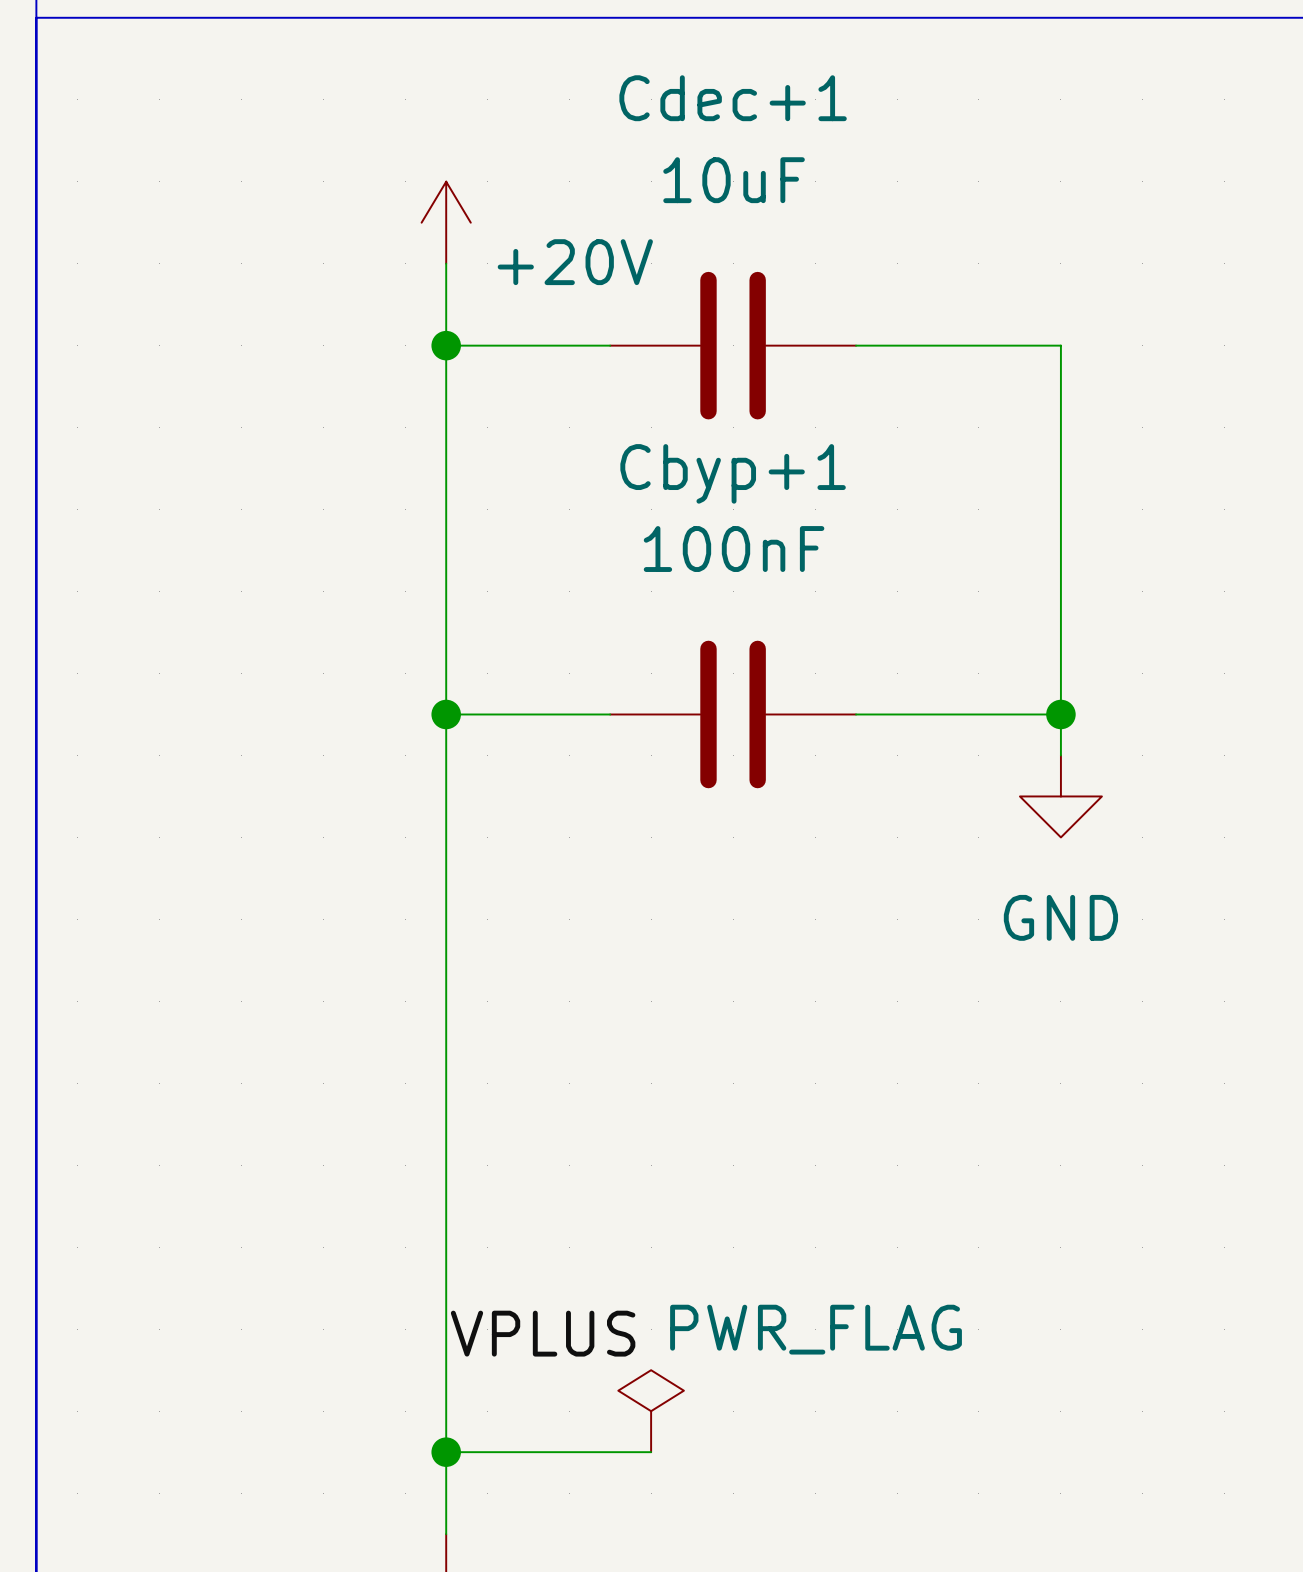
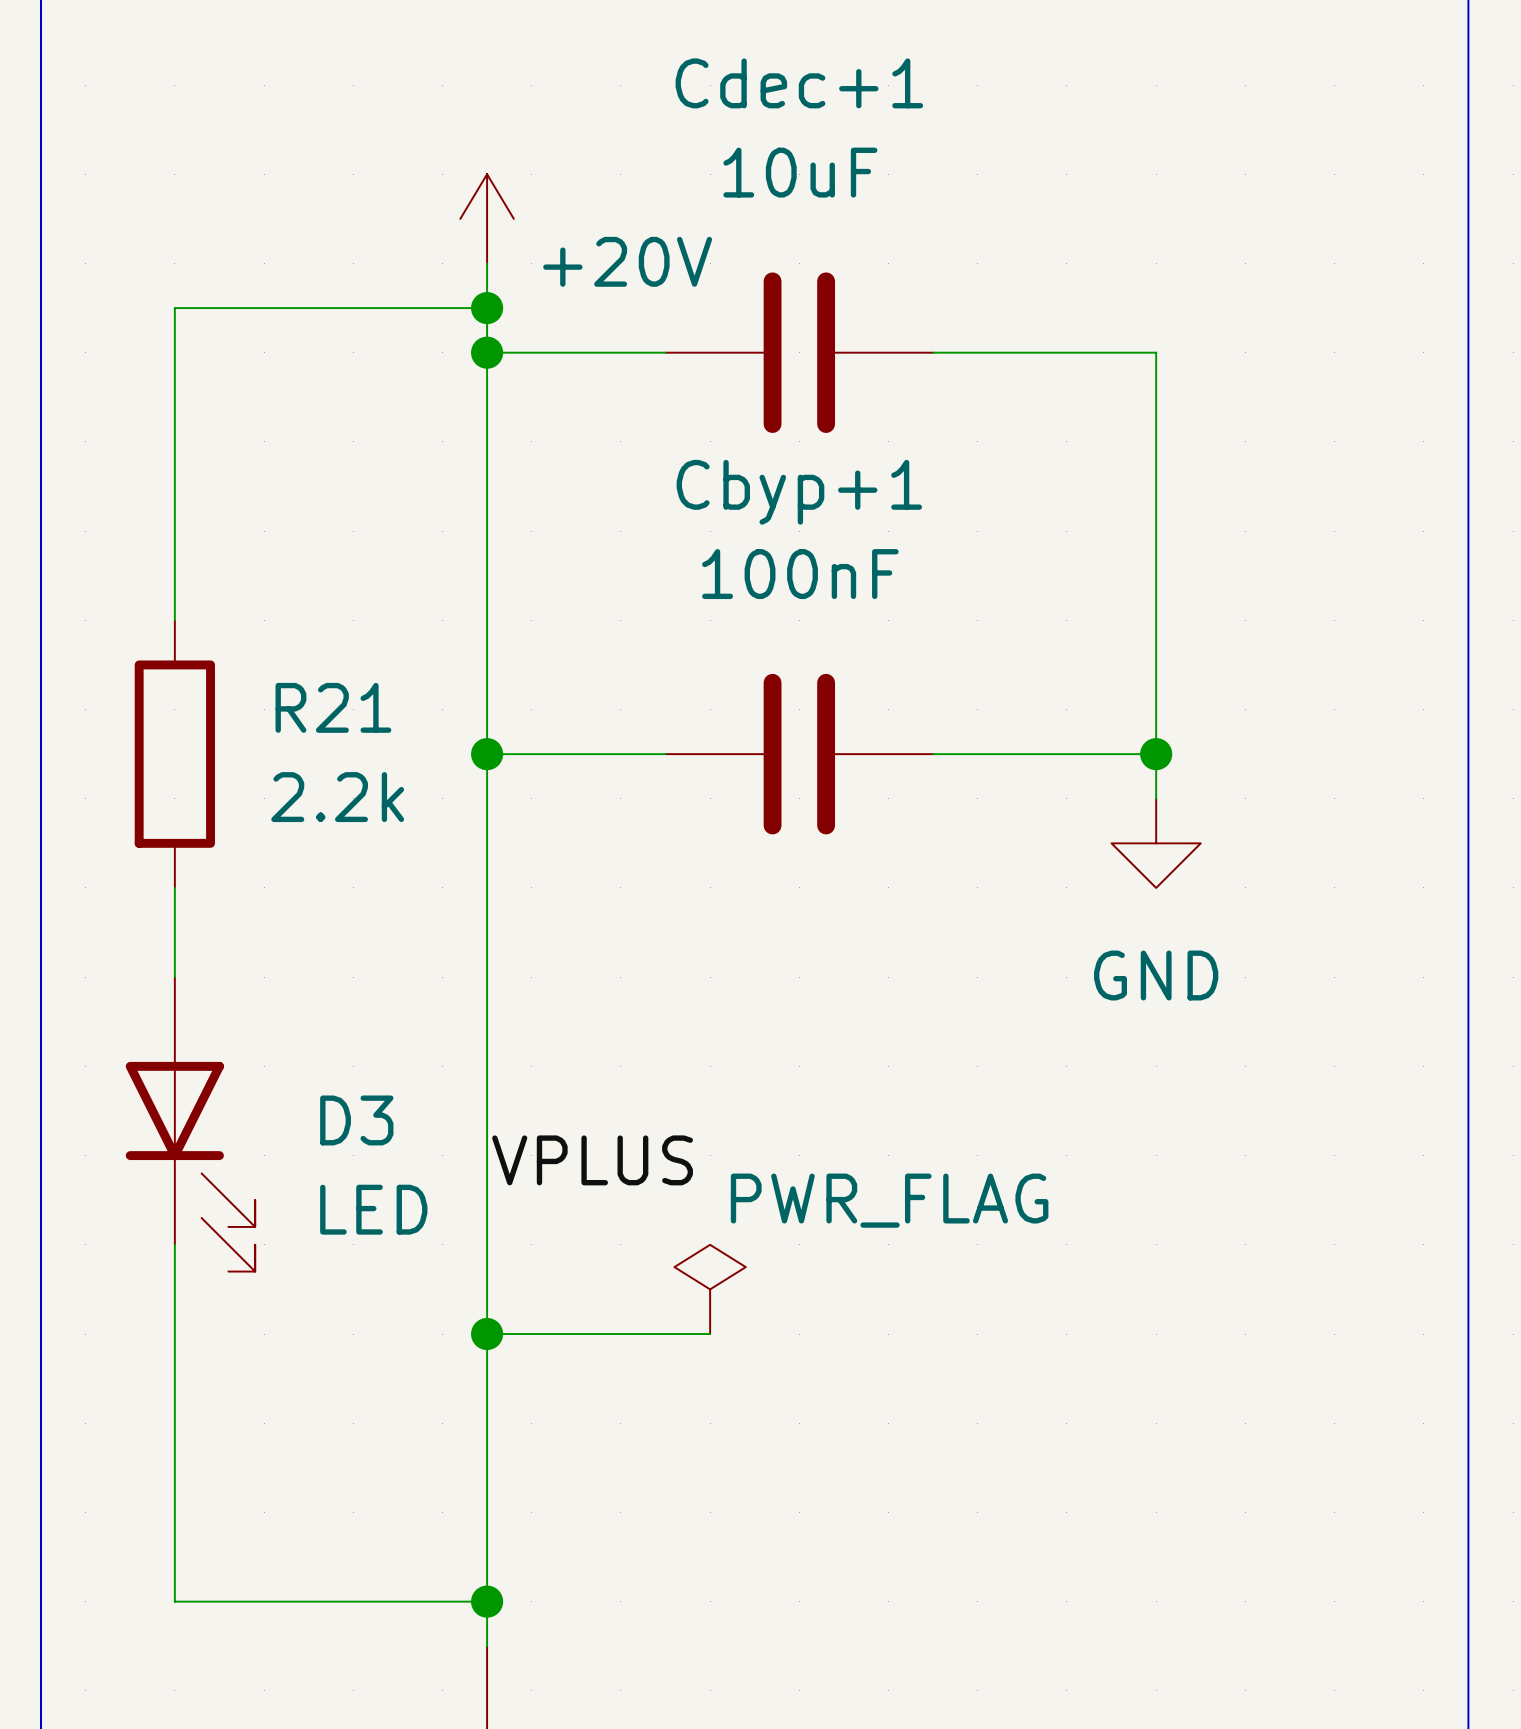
wire: none -> (487, 308) (174, 308) (174, 620)
junction: none -> (487, 308)
R21: none -> 2.2k (174, 754)
wire: none -> (174, 887) (174, 977)
D3: none -> LED (190, 1124)
wire: none -> (174, 1244) (174, 1601) (487, 1601)
junction: none -> (487, 1334)
label position: VPLUS (543, 1333) -> VPLUS (592, 1160)
power symbol position: PWR_FLAG (651, 1411) -> PWR_FLAG (710, 1289)
wire: (446, 1452) (651, 1452) -> (487, 1334) (710, 1334)
junction position: (446, 1452) -> (487, 1601)

